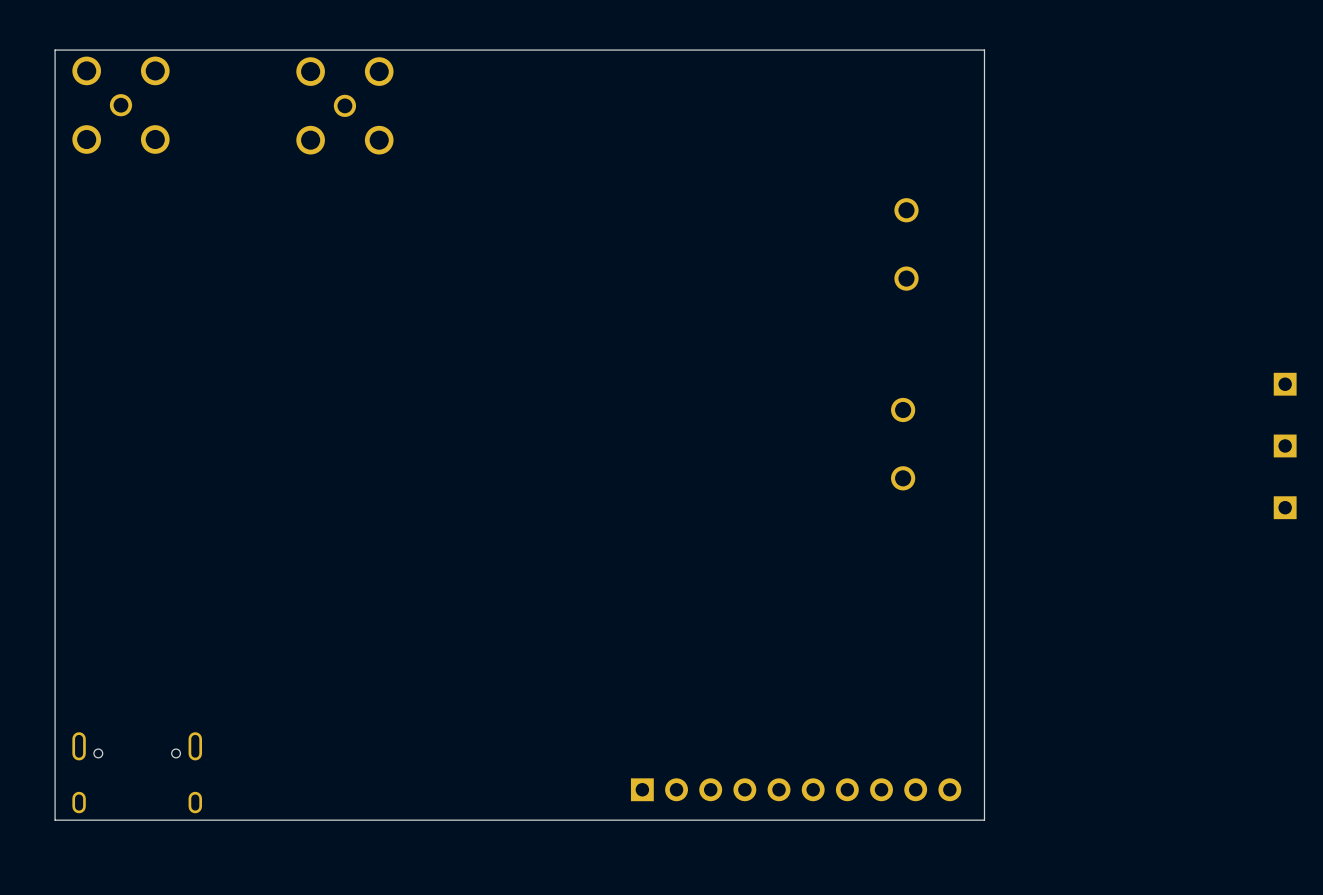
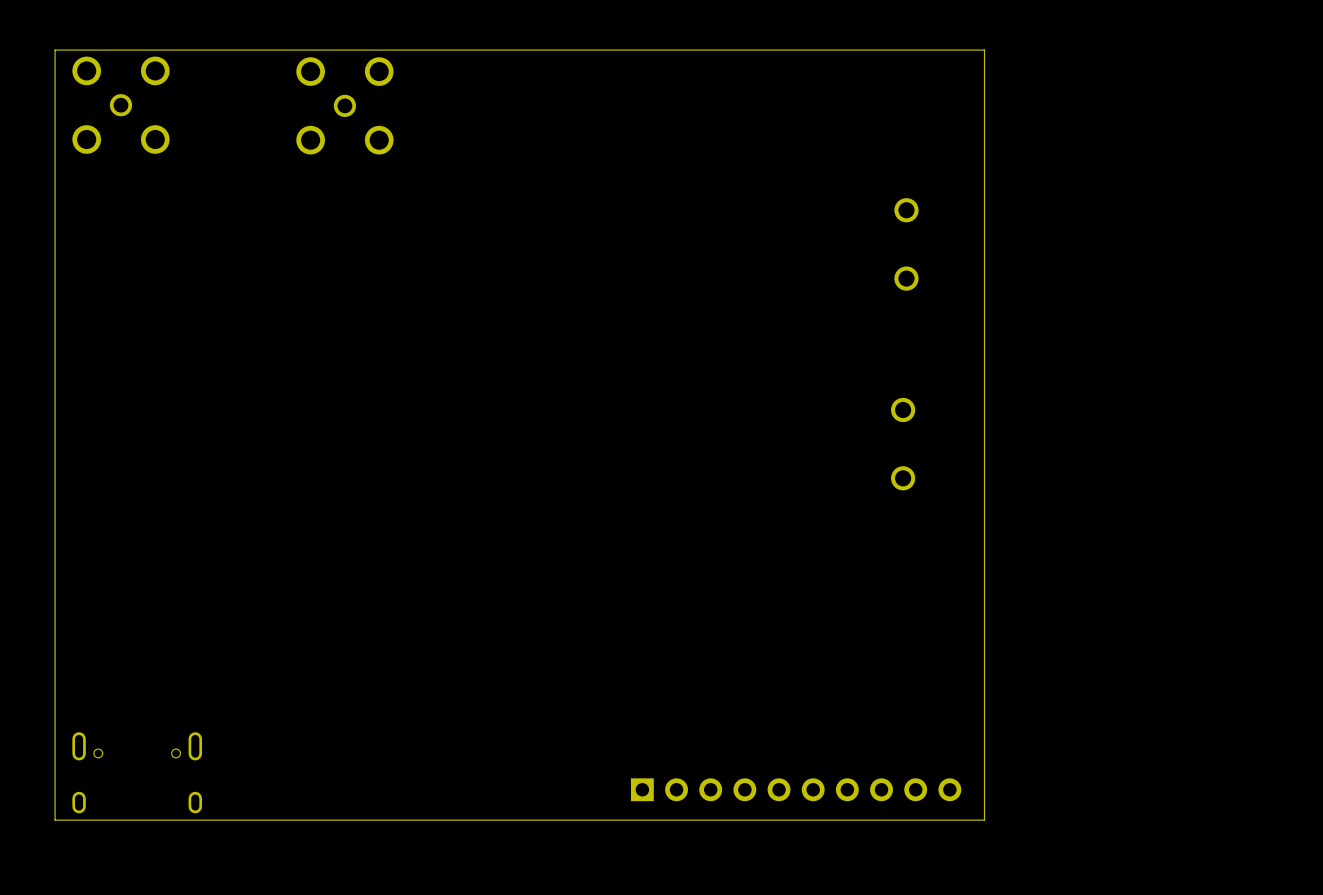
part: (1285, 384) -> none
part: (1285, 445) -> none
part: (1285, 507) -> none

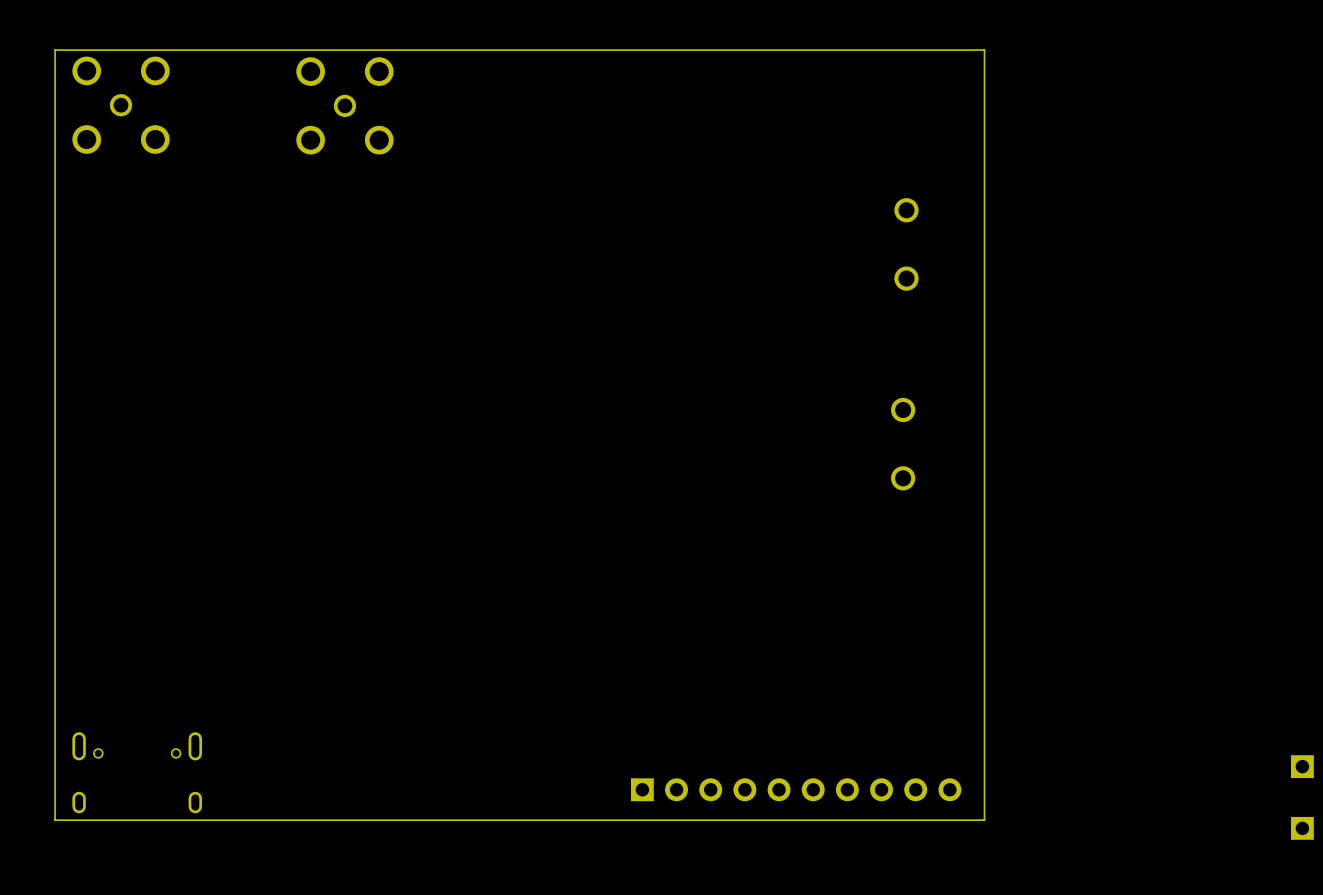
part: none -> (1302, 766)
part: none -> (1302, 828)

